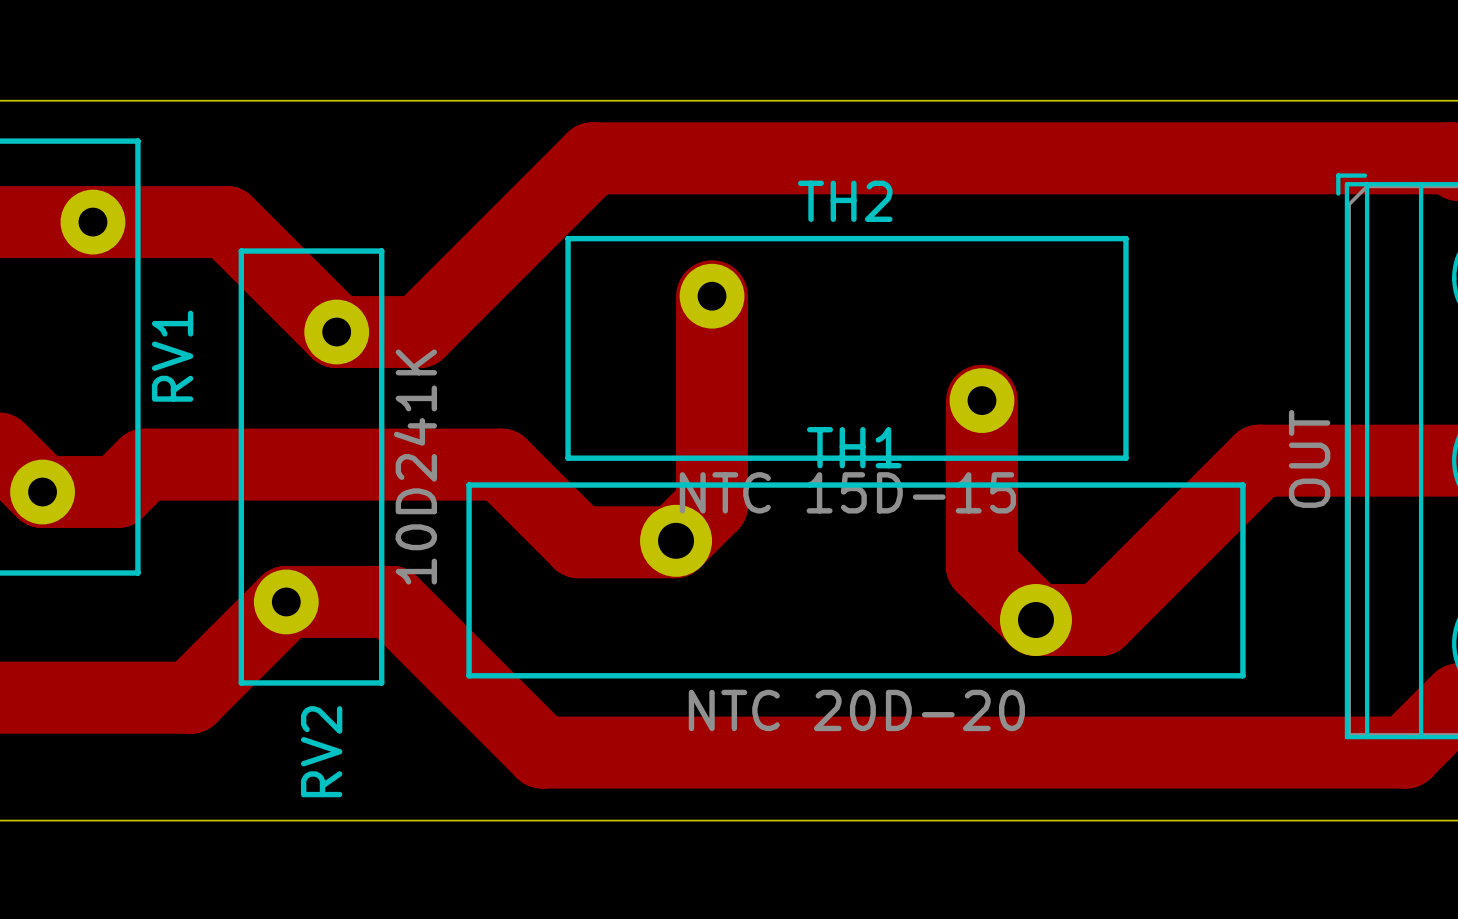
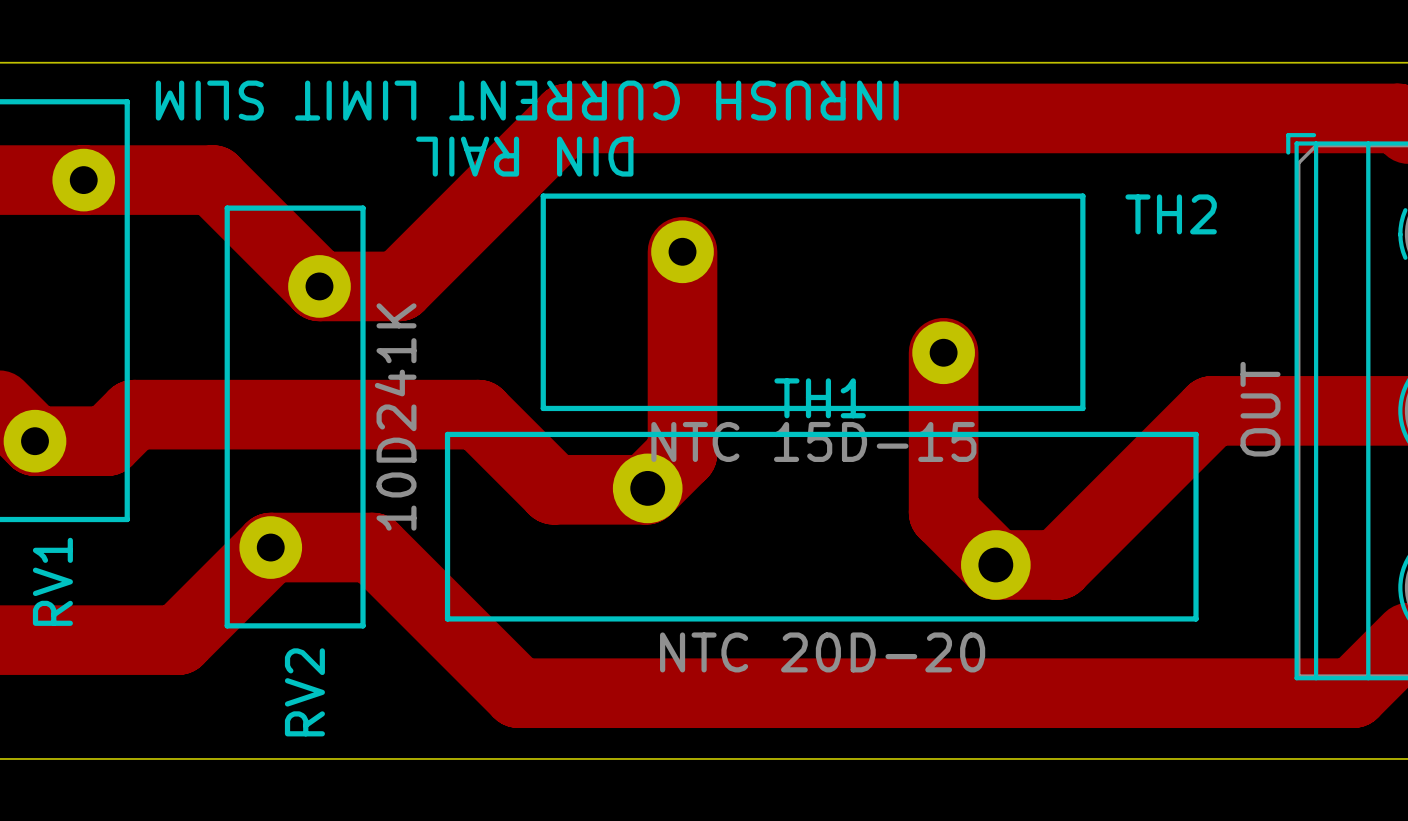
text: none -> INRUSH CURRENT LIMIT SLIM (527, 100)
text: none -> DIN RAIL (524, 156)
TH2 name position: TH2 (845, 201) -> TH2 (1171, 214)
RV1 name position: RV1 (172, 356) -> RV1 (52, 581)

